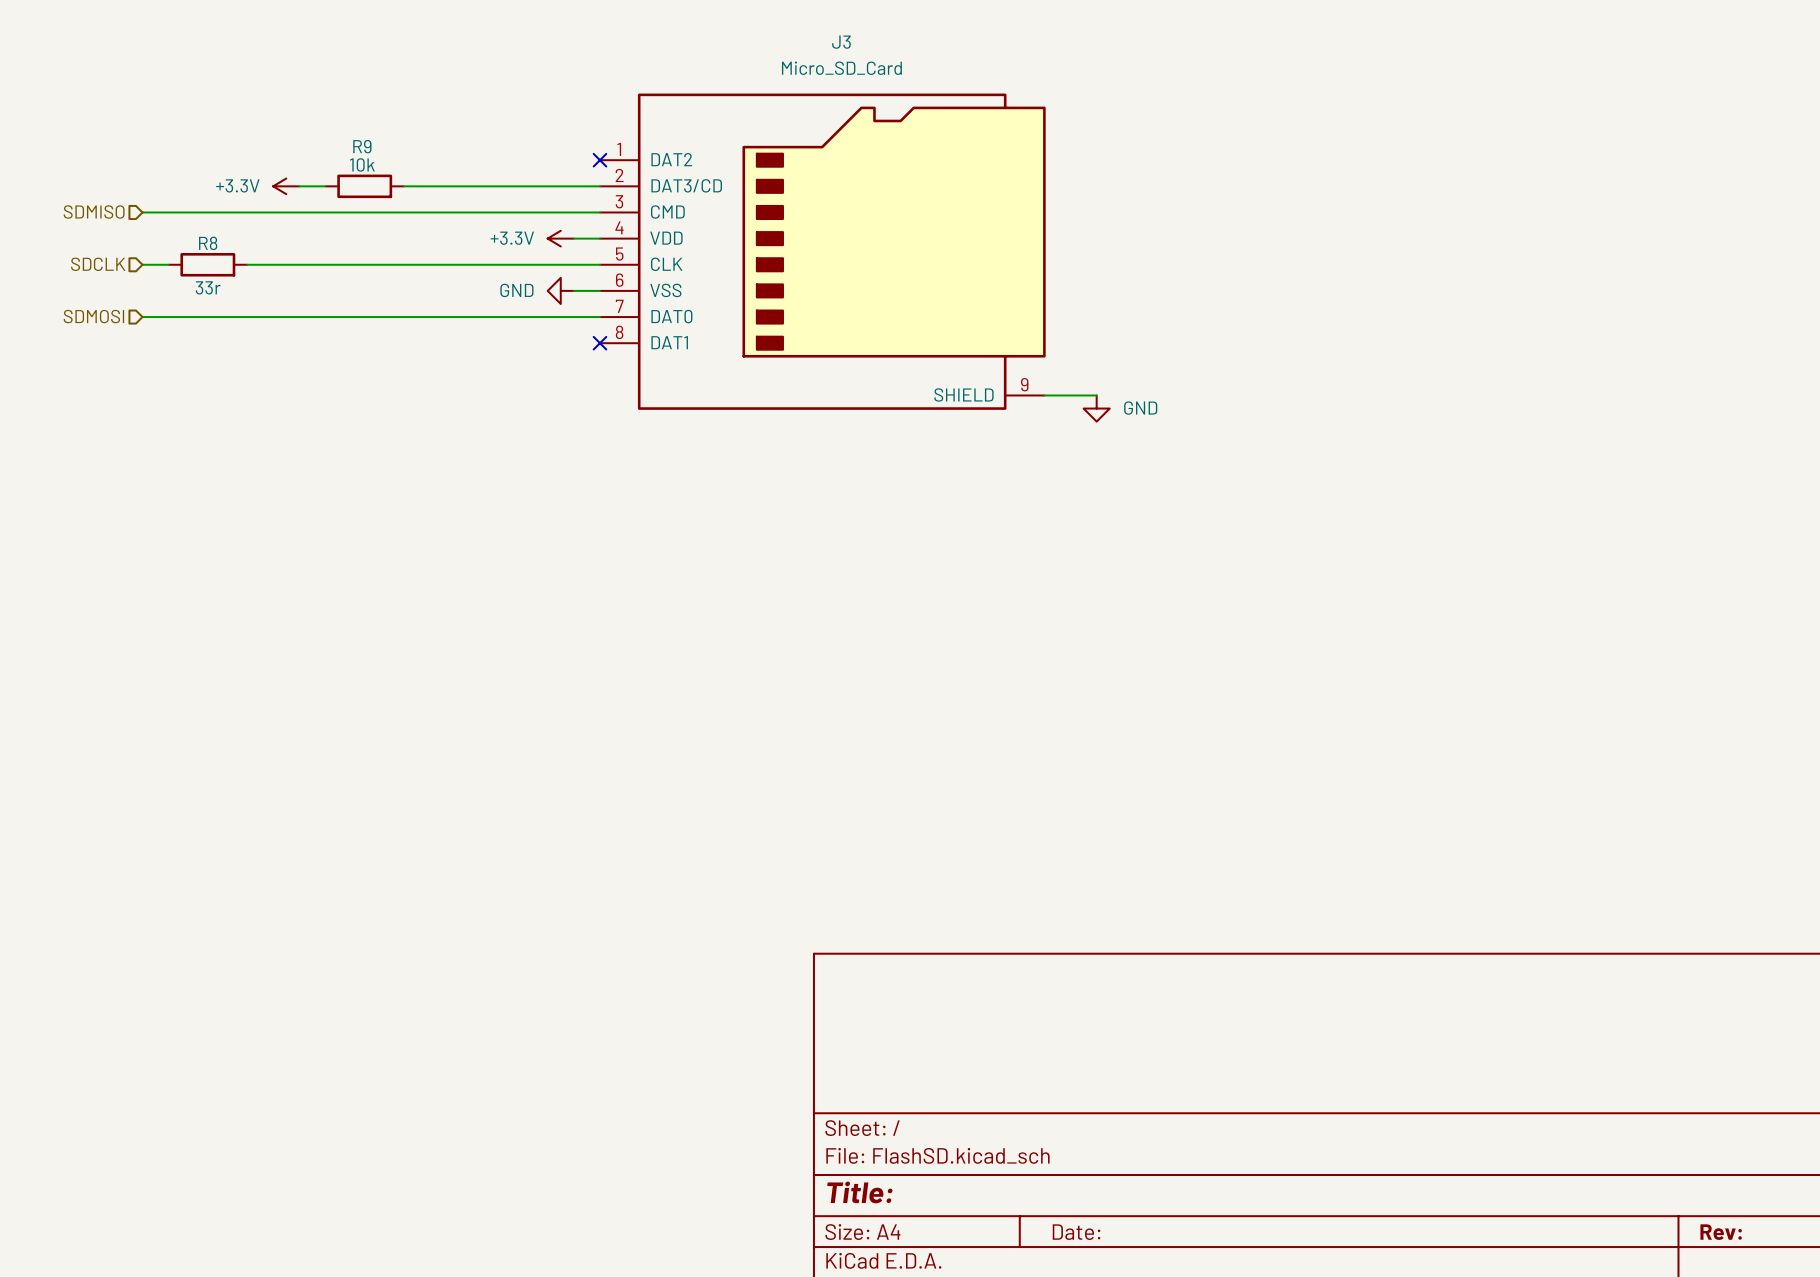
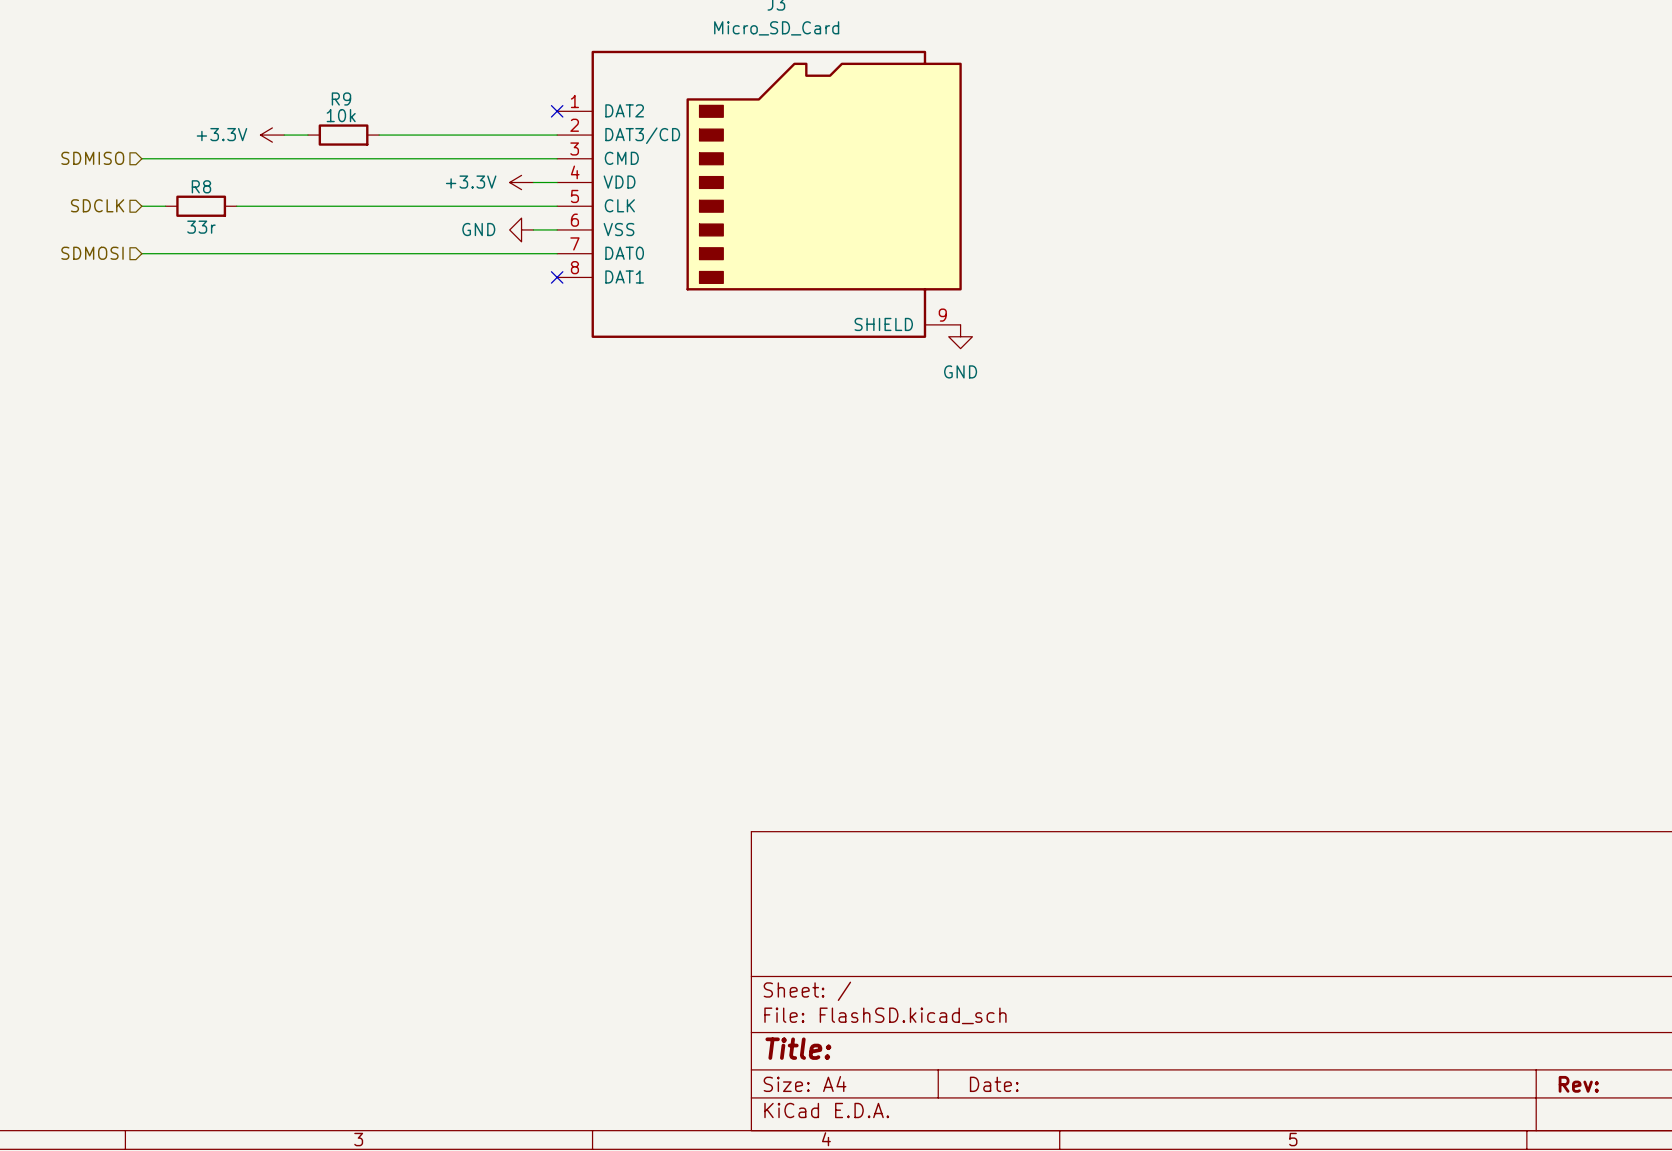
wire: (1044, 395) (1096, 395) -> none
power symbol position: GND (1096, 408) -> GND (960, 336)
power symbol text position: GND (1140, 408) -> GND (960, 371)

